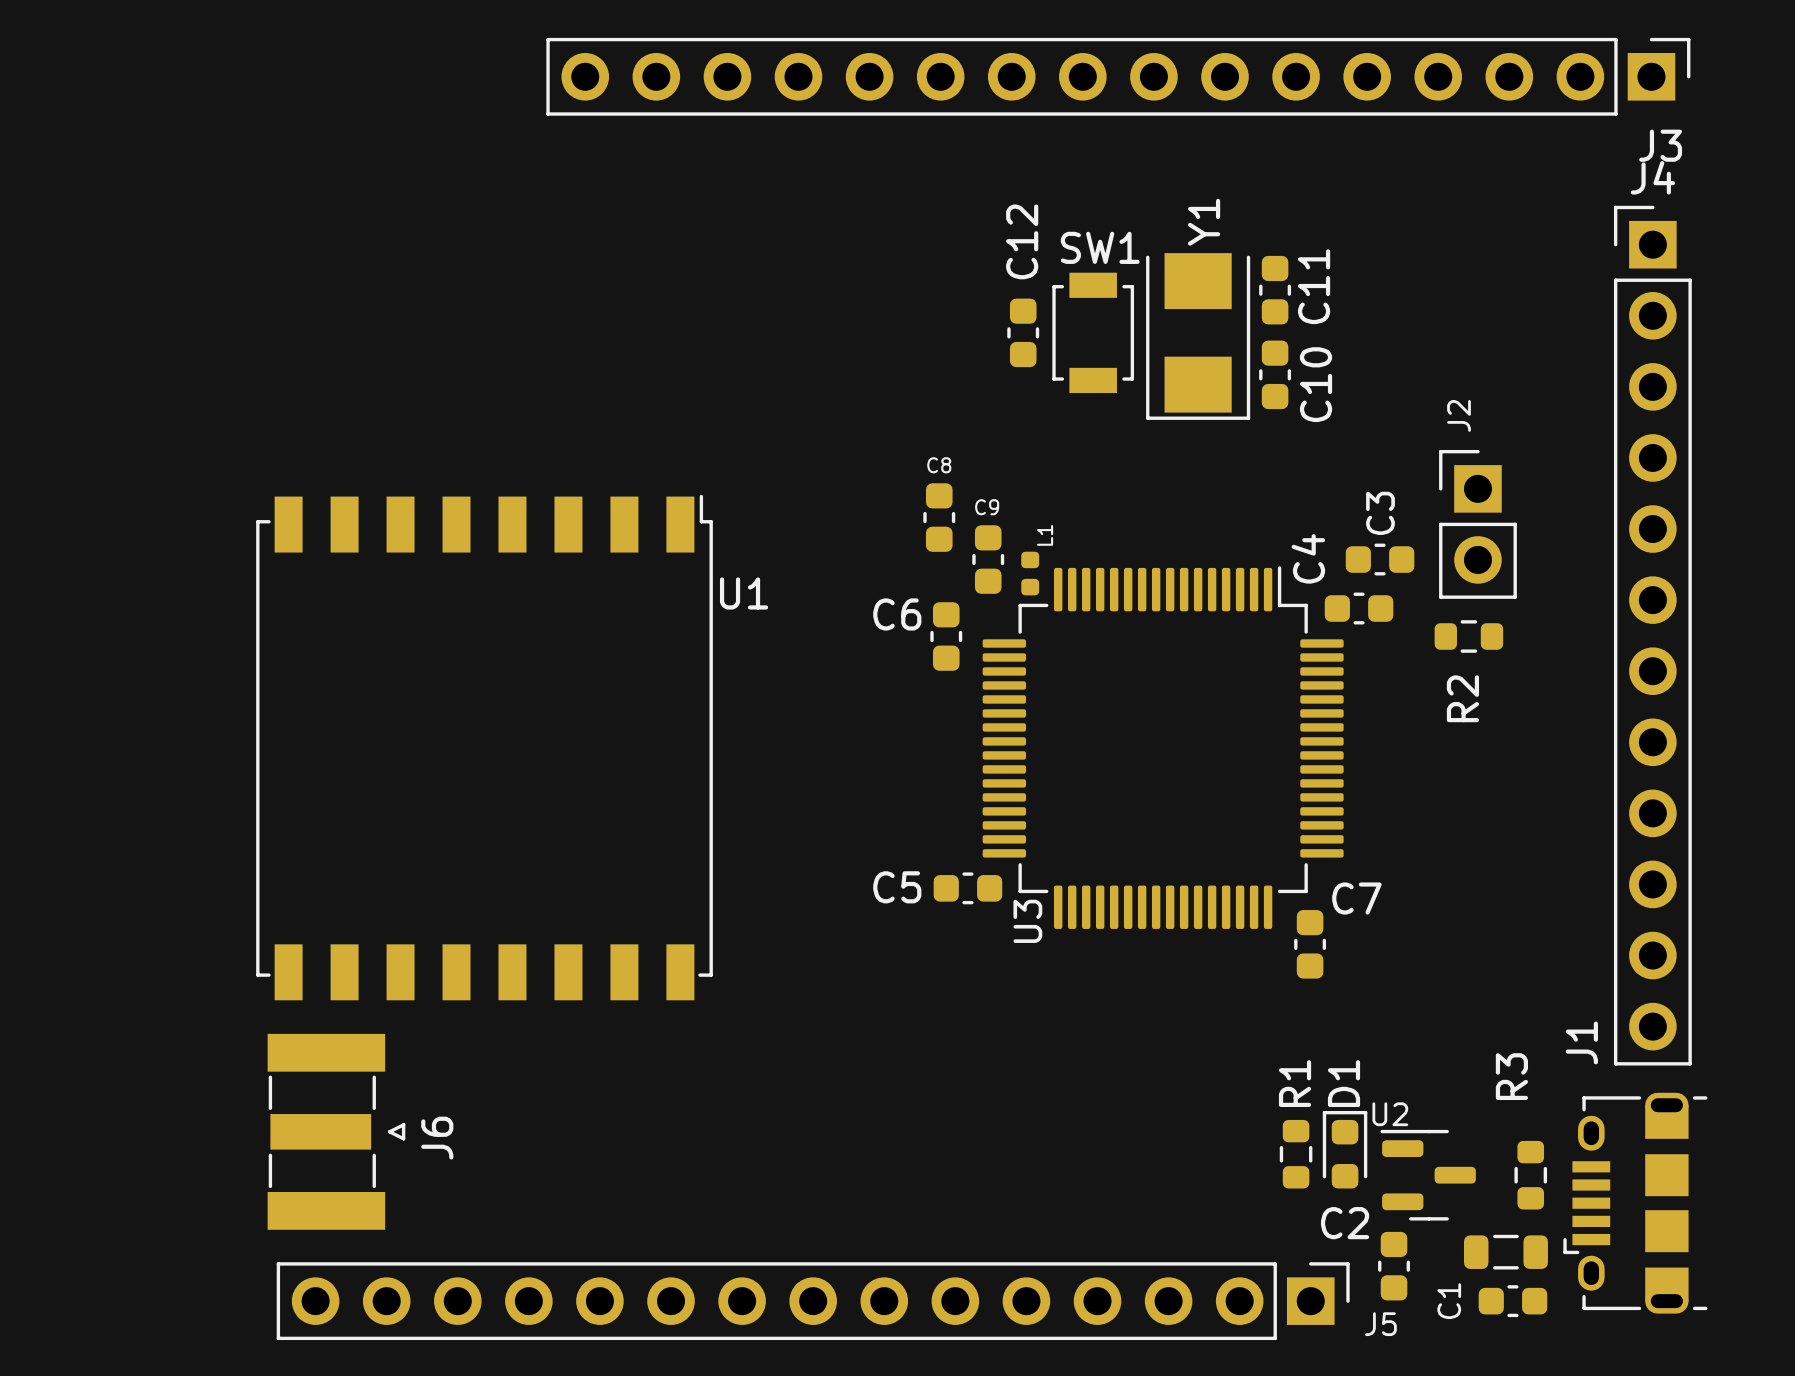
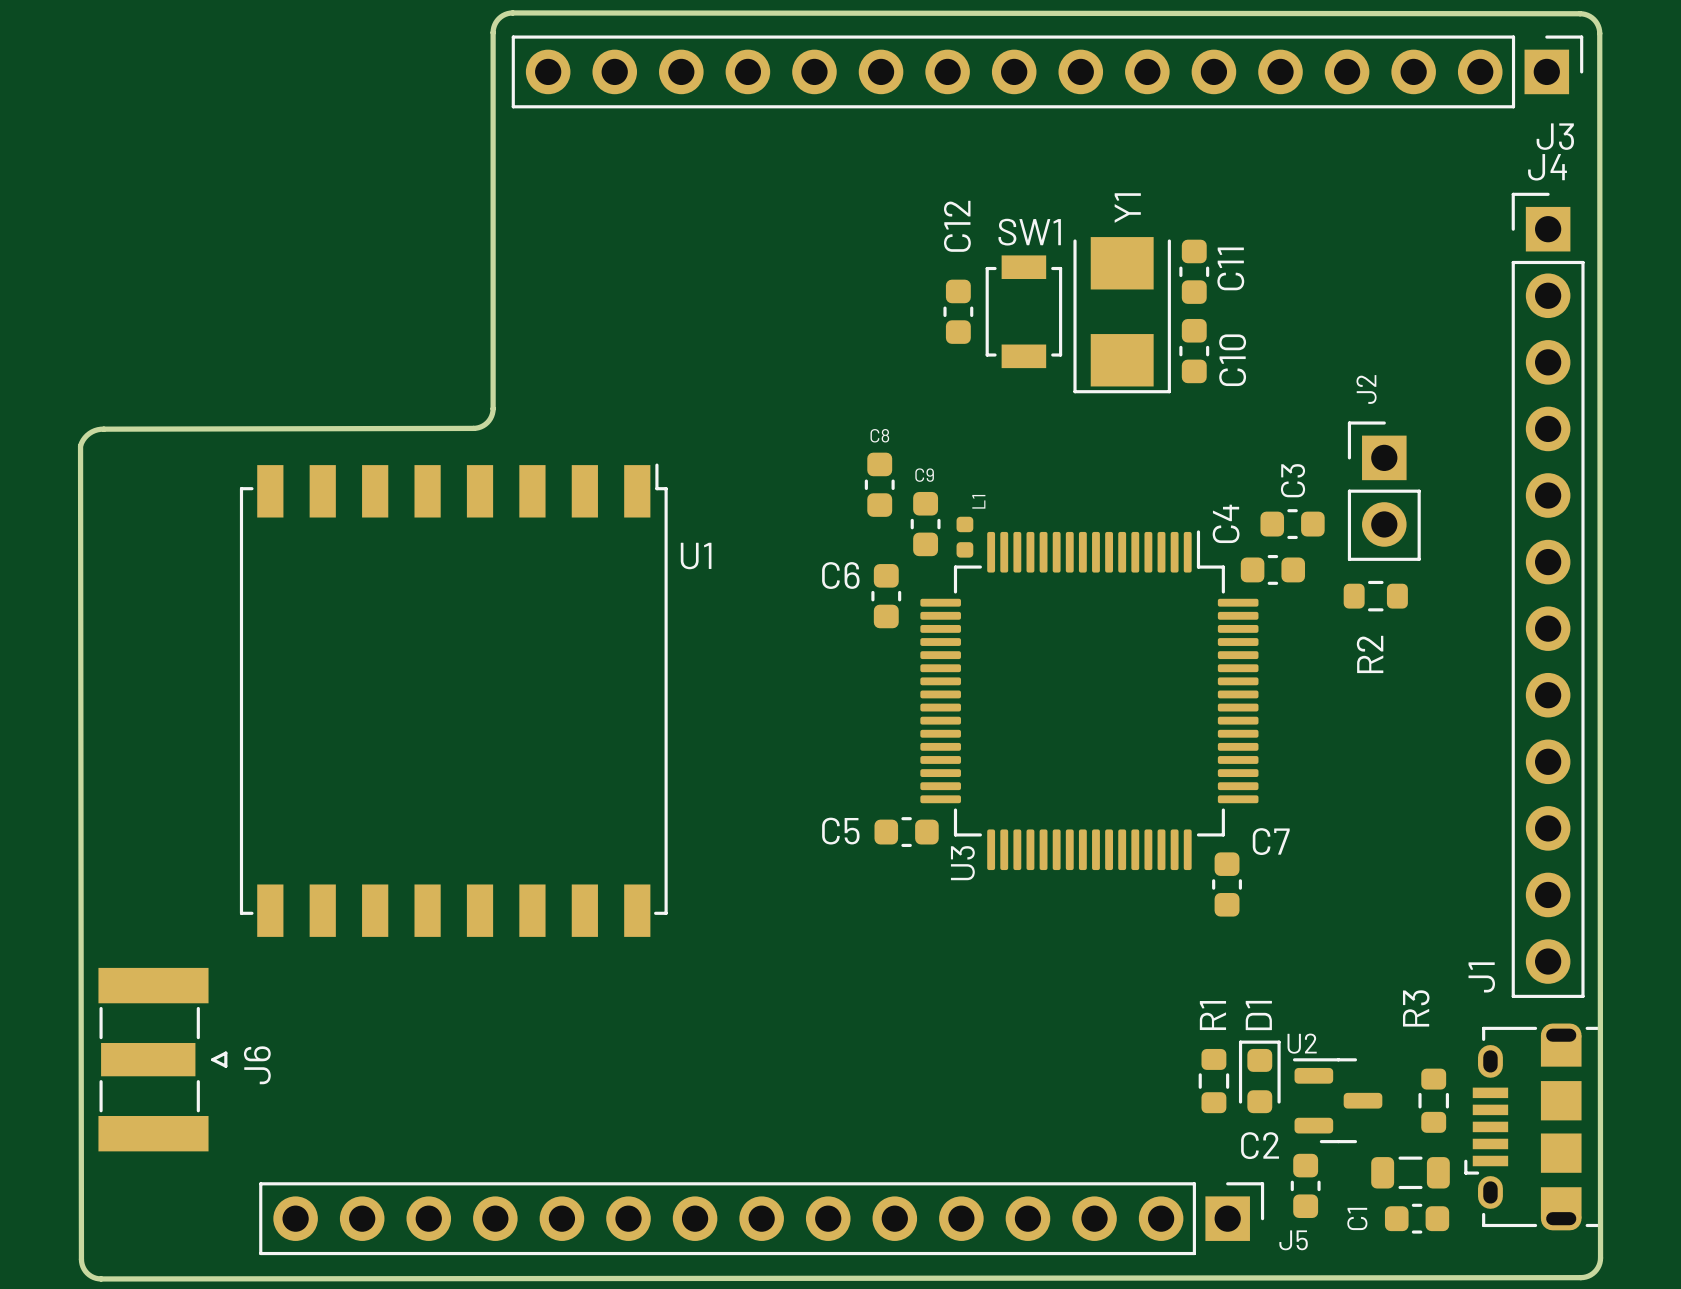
board edge: none -> (512, 12) (1580, 13) (1589, 16) (1595, 21) (1599, 33) (1600, 1257) (1599, 1265) (1592, 1273) (1580, 1277) (101, 1278) (91, 1276) (85, 1271) (81, 1259) (80, 445) (87, 435) (100, 429) (473, 428) (487, 422) (493, 408) (493, 32) (498, 18) (512, 12)
J6 position: (336, 1131) -> (162, 1059)

